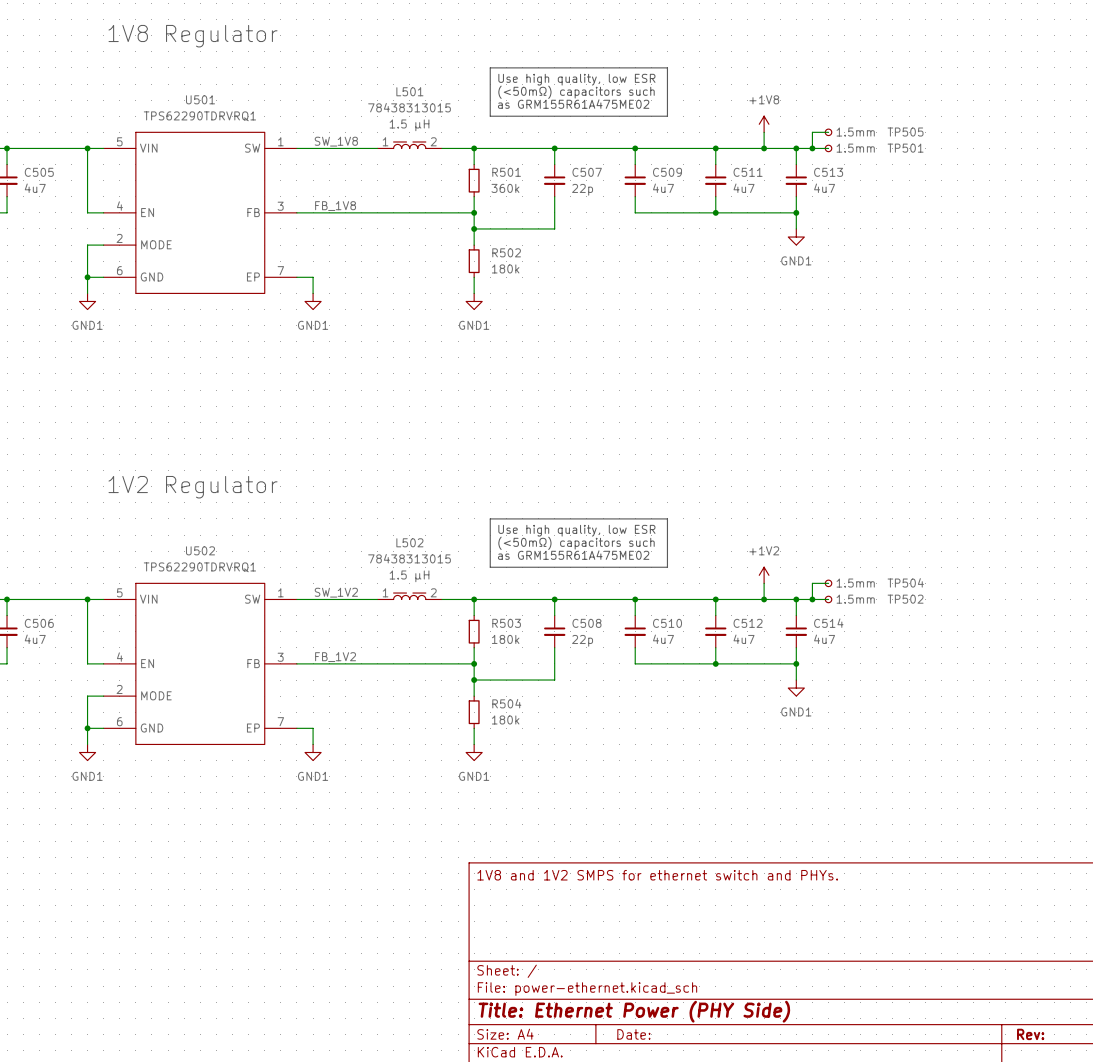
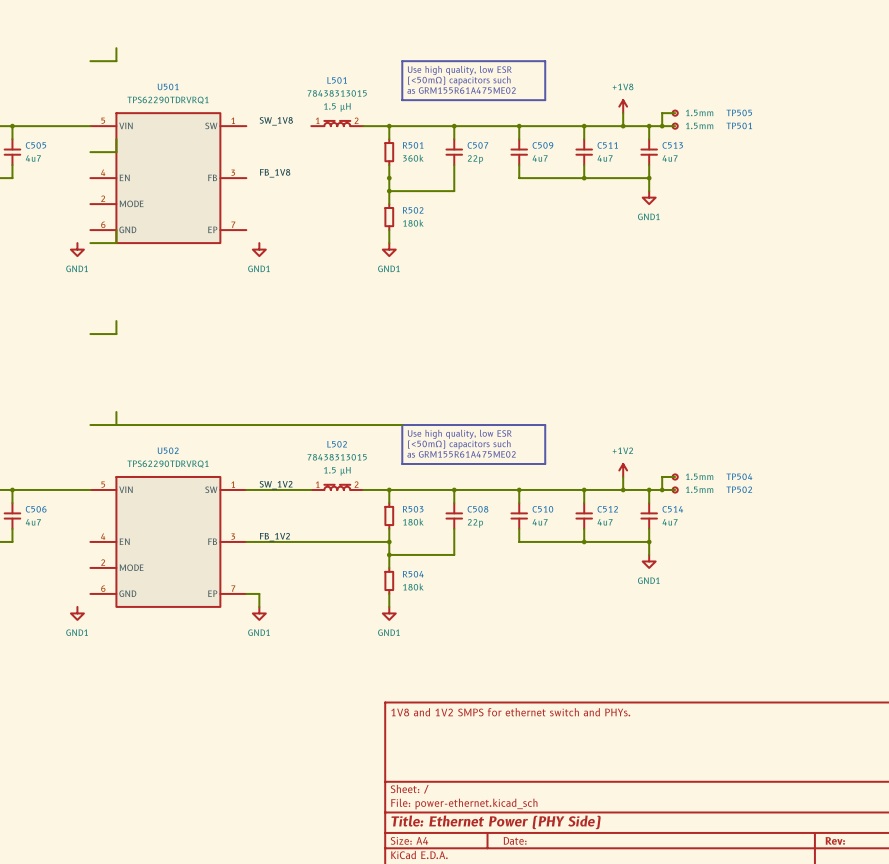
text: 1V8 Regulator (193, 36) -> none
wire: none -> (116, 48) (116, 61) (90, 61)
wire: (87, 148) (87, 212) (103, 212) -> none
junction: (87, 148) -> none
wire: (296, 148) (377, 148) -> none
wire: none -> (116, 139) (116, 152) (90, 152)
wire: (296, 212) (474, 212) -> none
wire: (103, 245) (87, 245) (87, 293) -> none
wire: (87, 277) (103, 277) -> none
junction: (87, 277) -> none
wire: none -> (116, 230) (116, 243) (90, 243)
wire: (296, 277) (313, 277) (313, 293) -> none
wire: none -> (116, 321) (116, 334) (90, 334)
text: 1V2 Regulator (193, 487) -> none
wire: none -> (116, 412) (116, 425)
wire: none -> (90, 425) (402, 425)
wire: (87, 599) (87, 663) (103, 663) -> none
junction: (87, 599) -> none
wire: (103, 696) (87, 696) (87, 744) -> none
wire: (87, 728) (103, 728) -> none
junction: (87, 728) -> none

